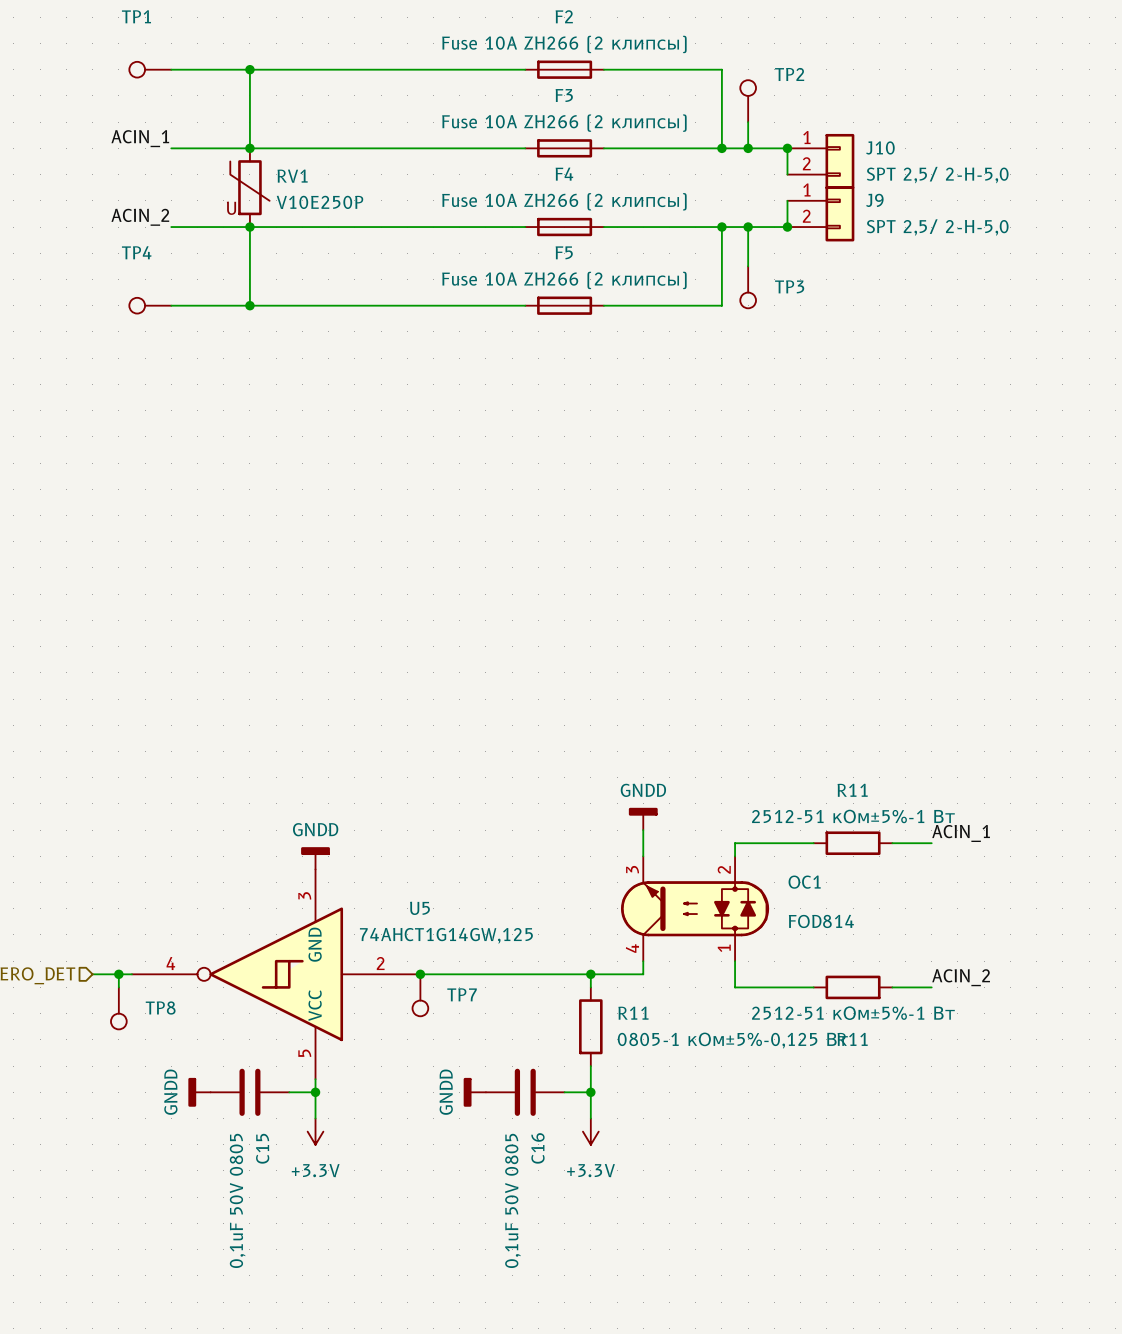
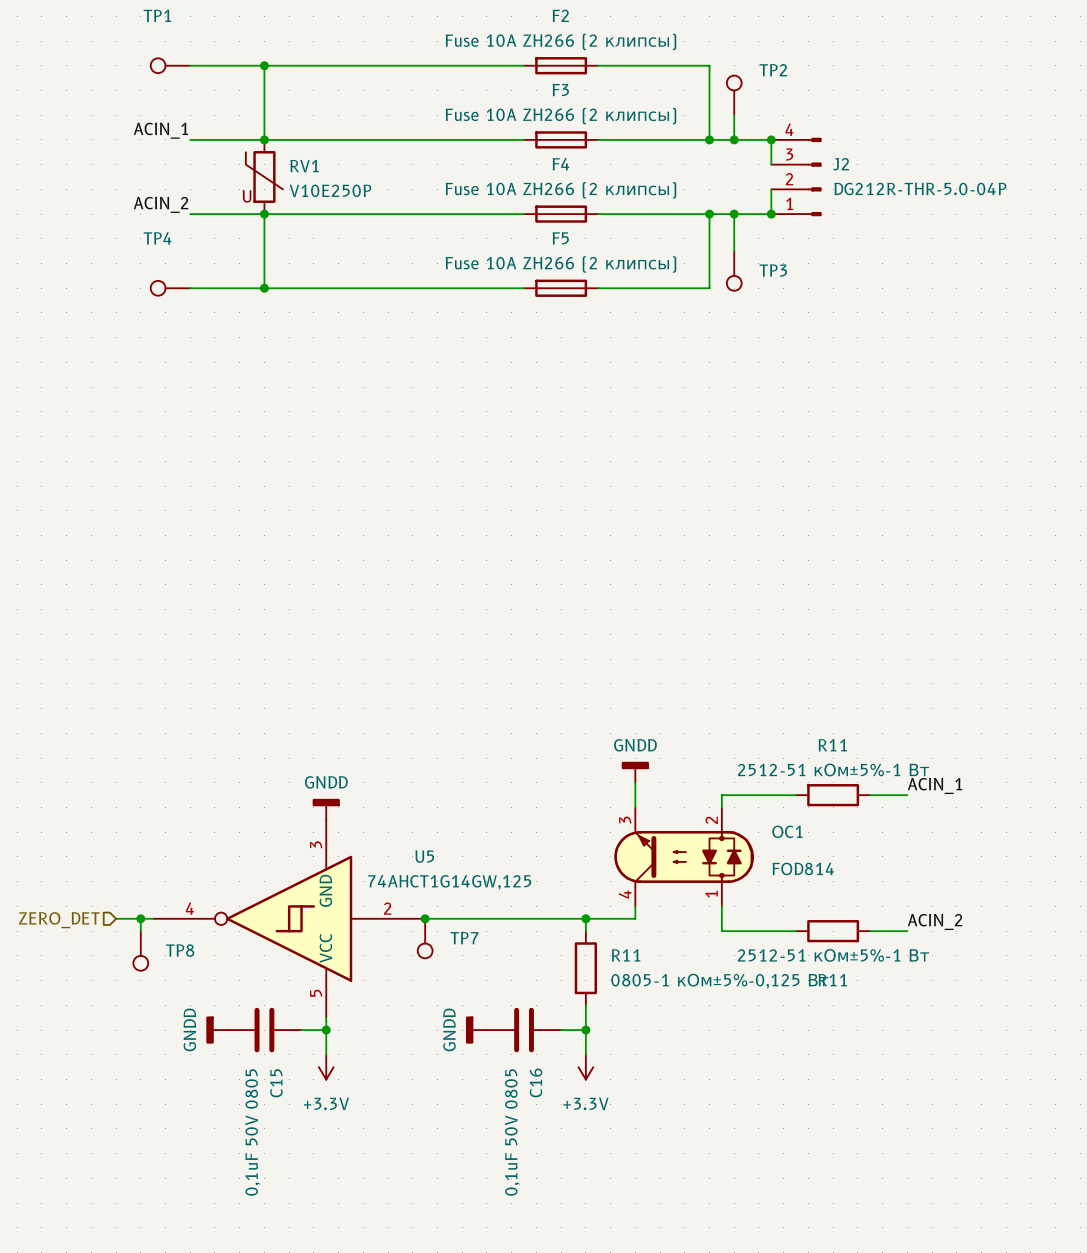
J10: SPT 2,5/ 2-H-5,0 (820, 161) -> none
J2: none -> DG212R-THR-5.0-04P (796, 177)
J9: SPT 2,5/ 2-H-5,0 (820, 213) -> none

